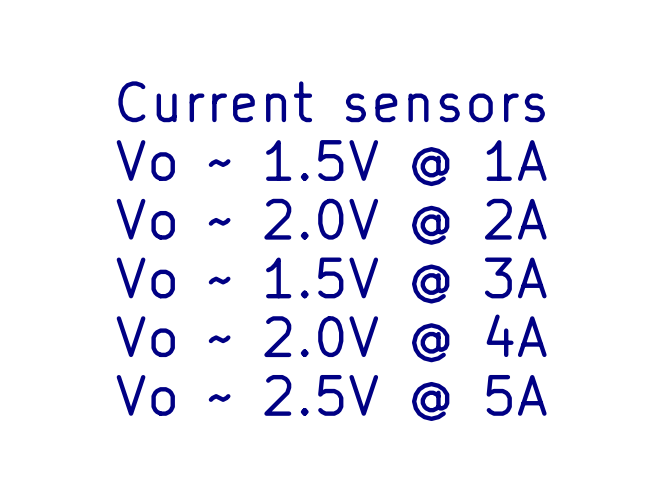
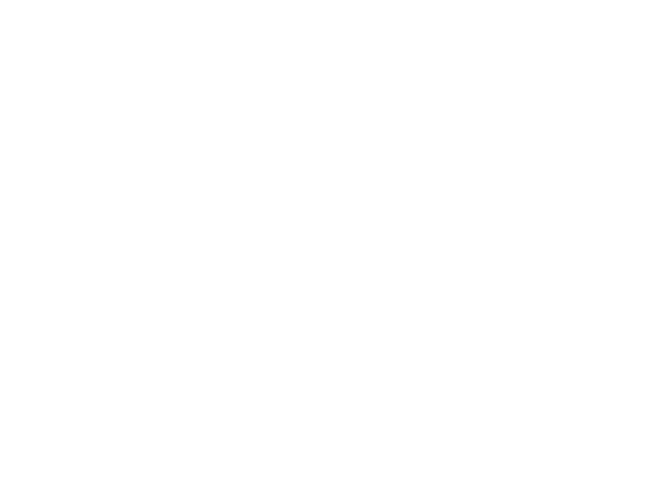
text: Current sensors (331, 101) -> none
text: Vo ~ 1.5V @ 1A (331, 163) -> none
text: Vo ~ 2.0V @ 2A (331, 221) -> none
text: Vo ~ 1.5V @ 3A (331, 280) -> none
text: Vo ~ 2.0V @ 4A (331, 338) -> none
text: Vo ~ 2.5V @ 5A (331, 397) -> none

